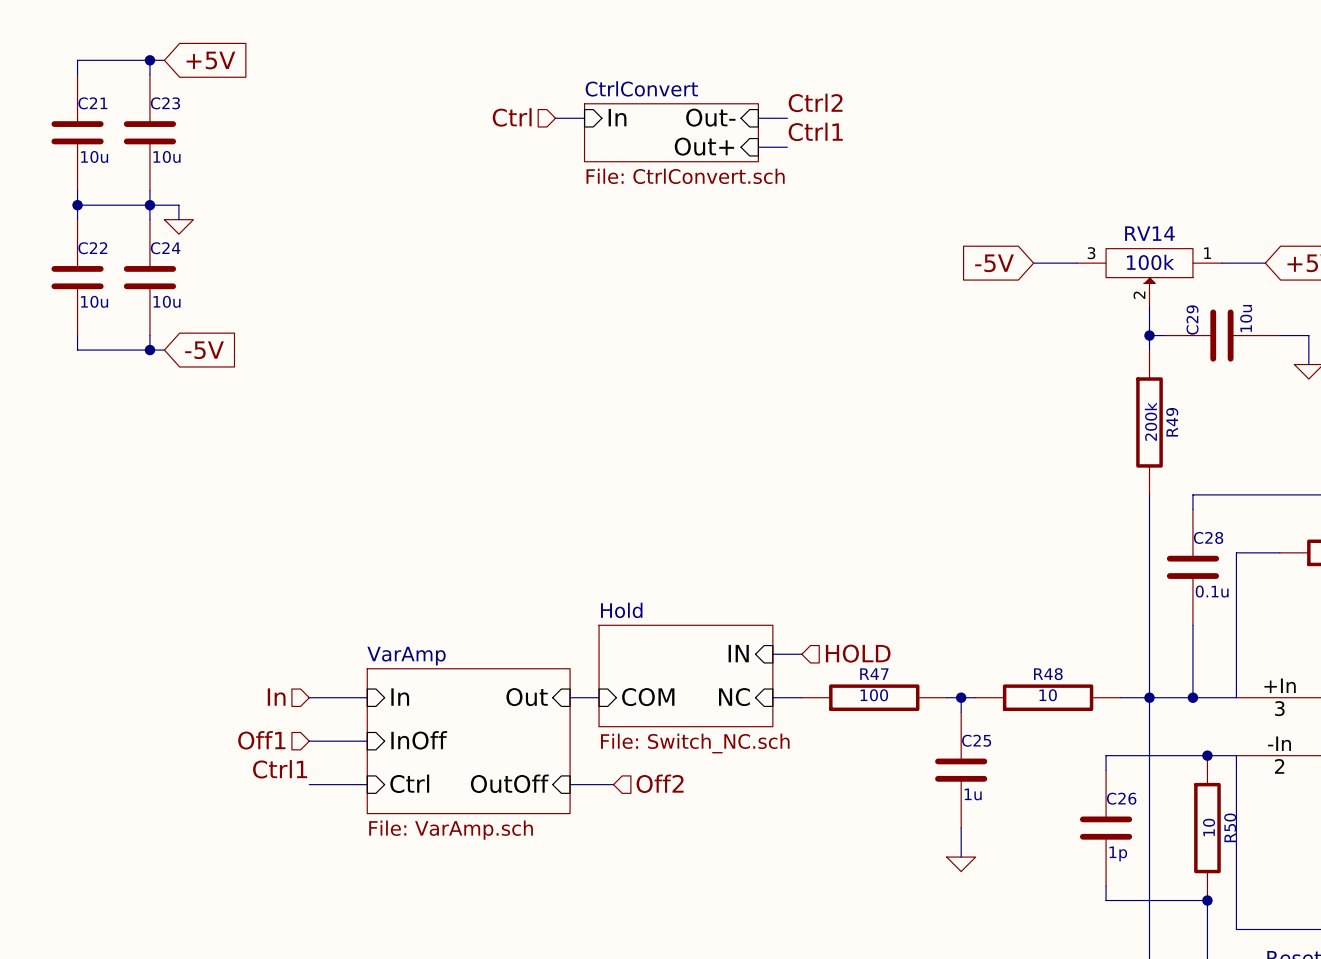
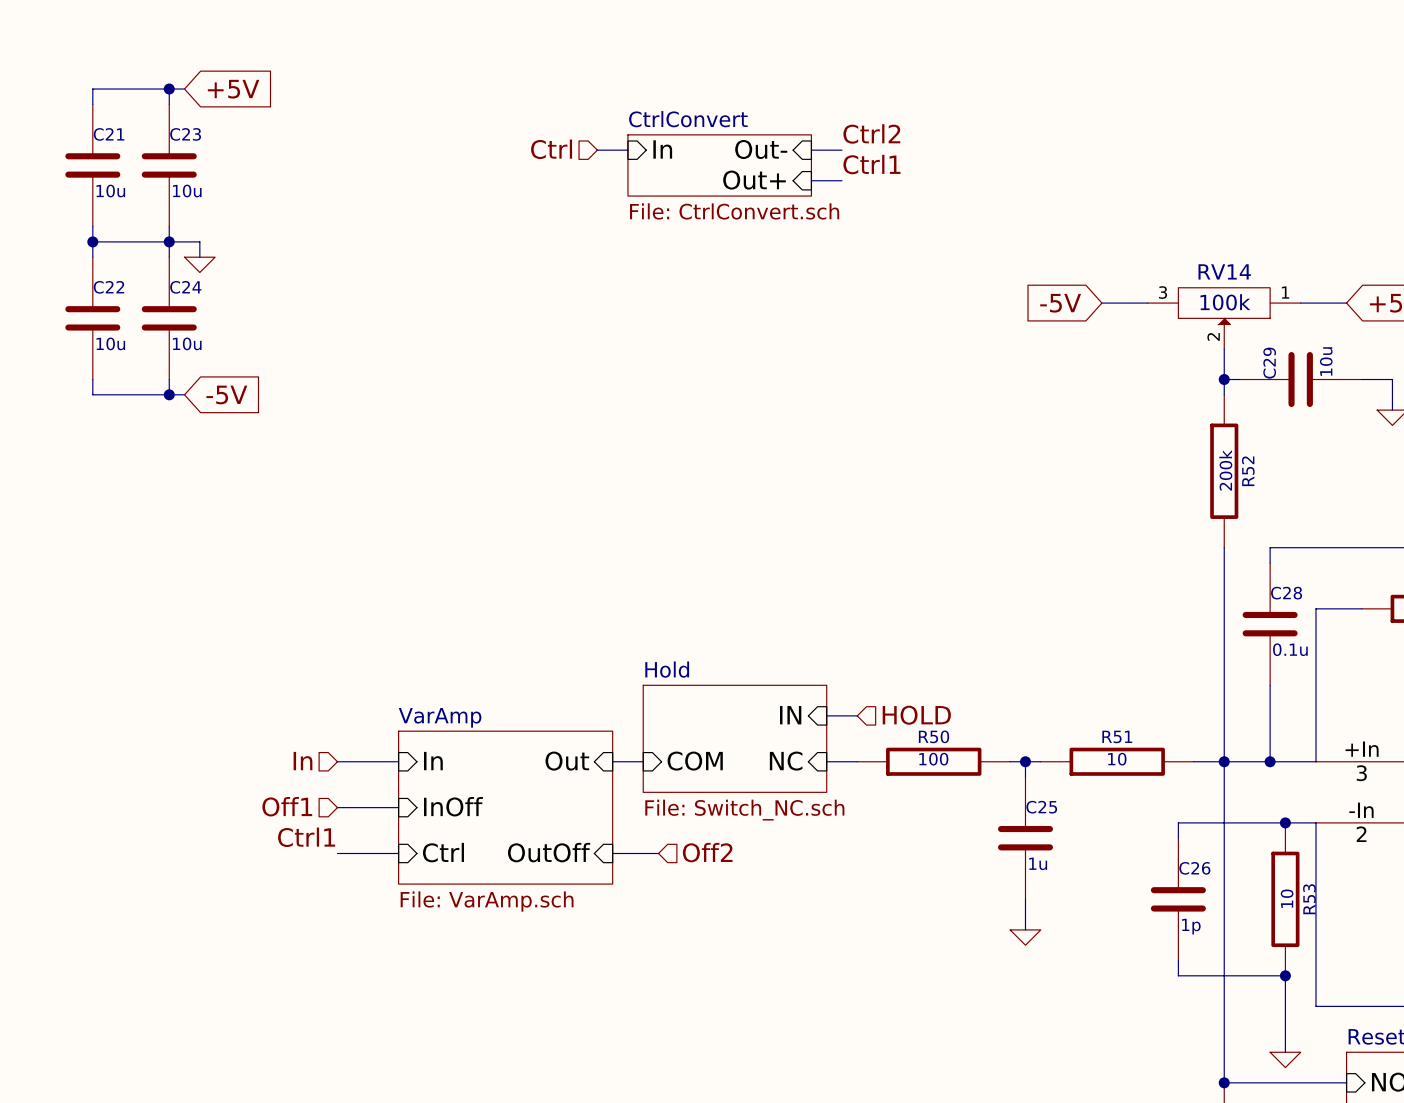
R49 name: R49 (1172, 422) -> R52 (1248, 471)
R47 name: R47 (874, 674) -> R50 (934, 736)
R48 name: R48 (1048, 674) -> R51 (1117, 736)
R50 name: R50 (1230, 827) -> R53 (1309, 899)

